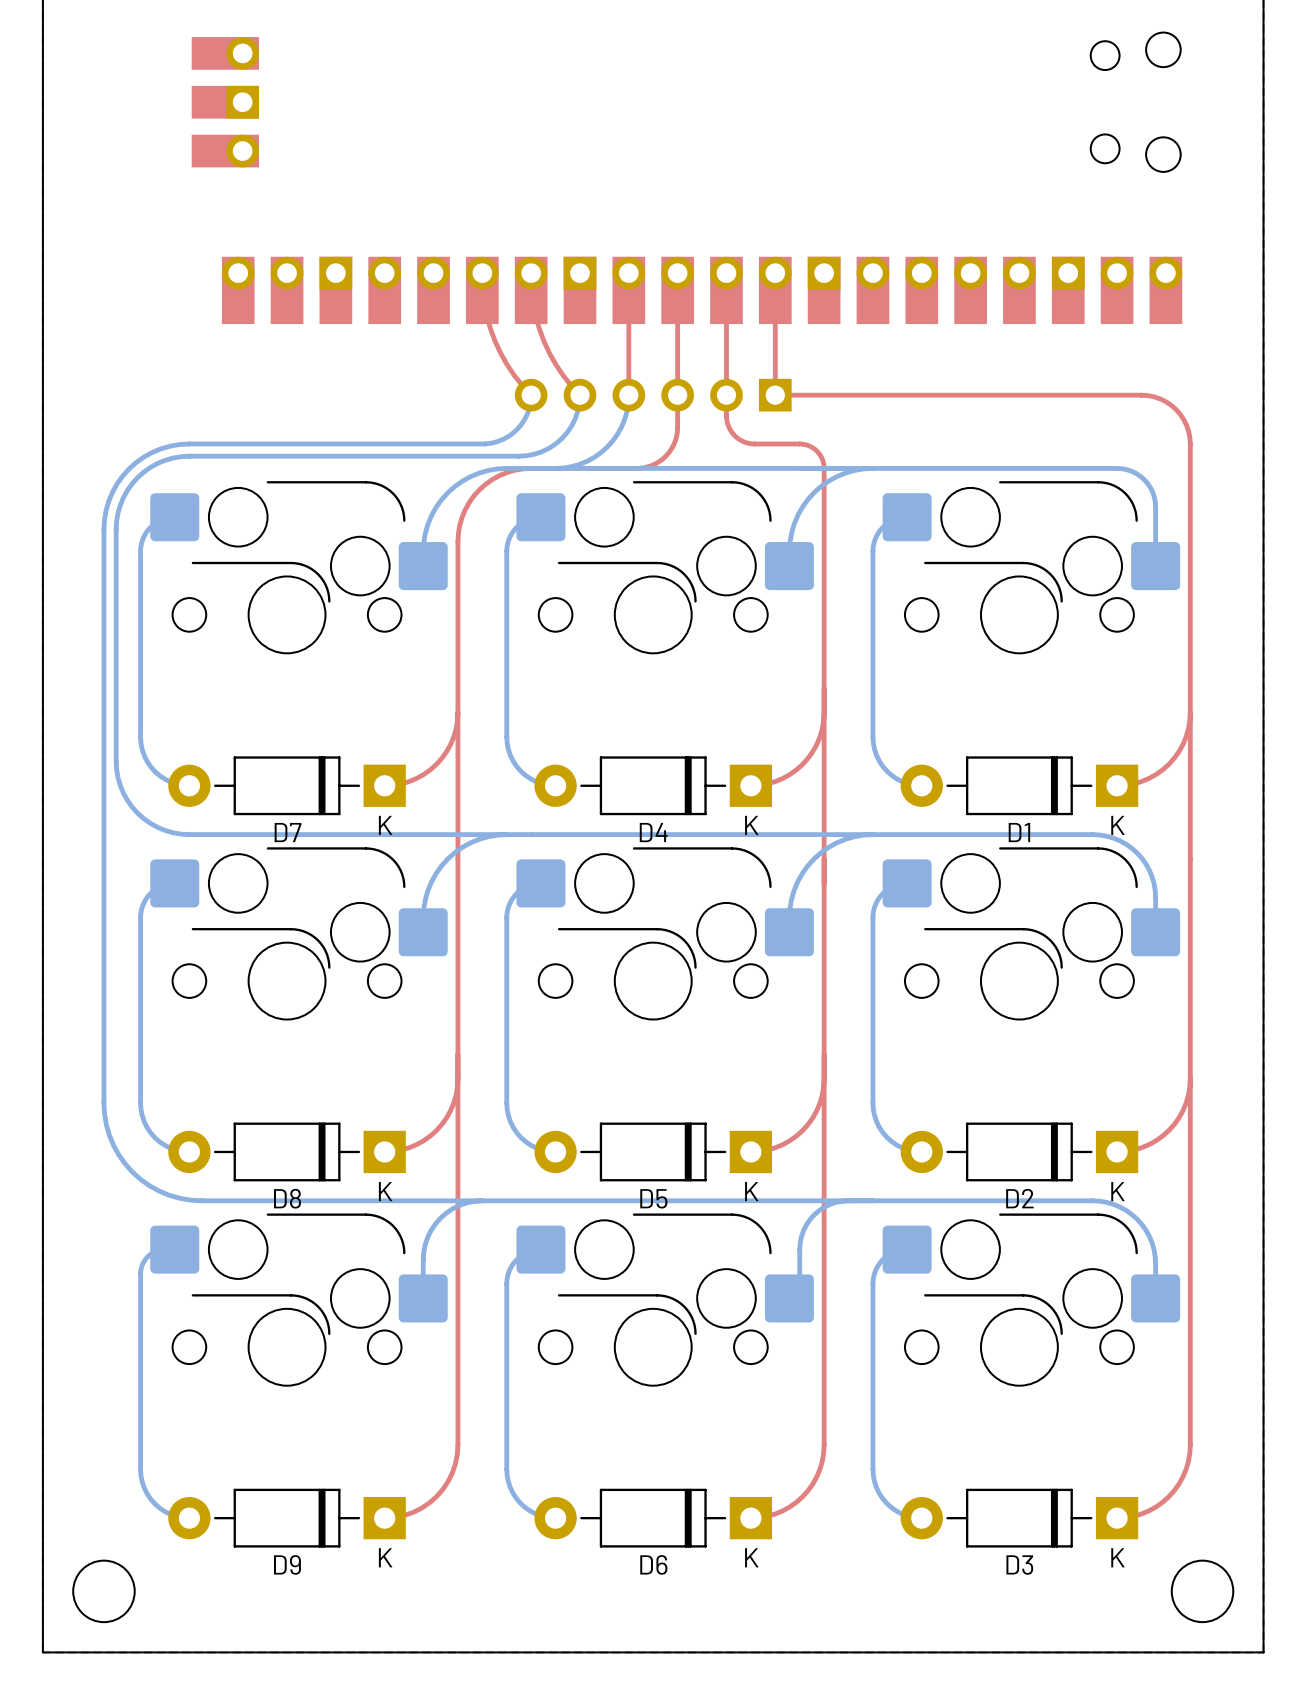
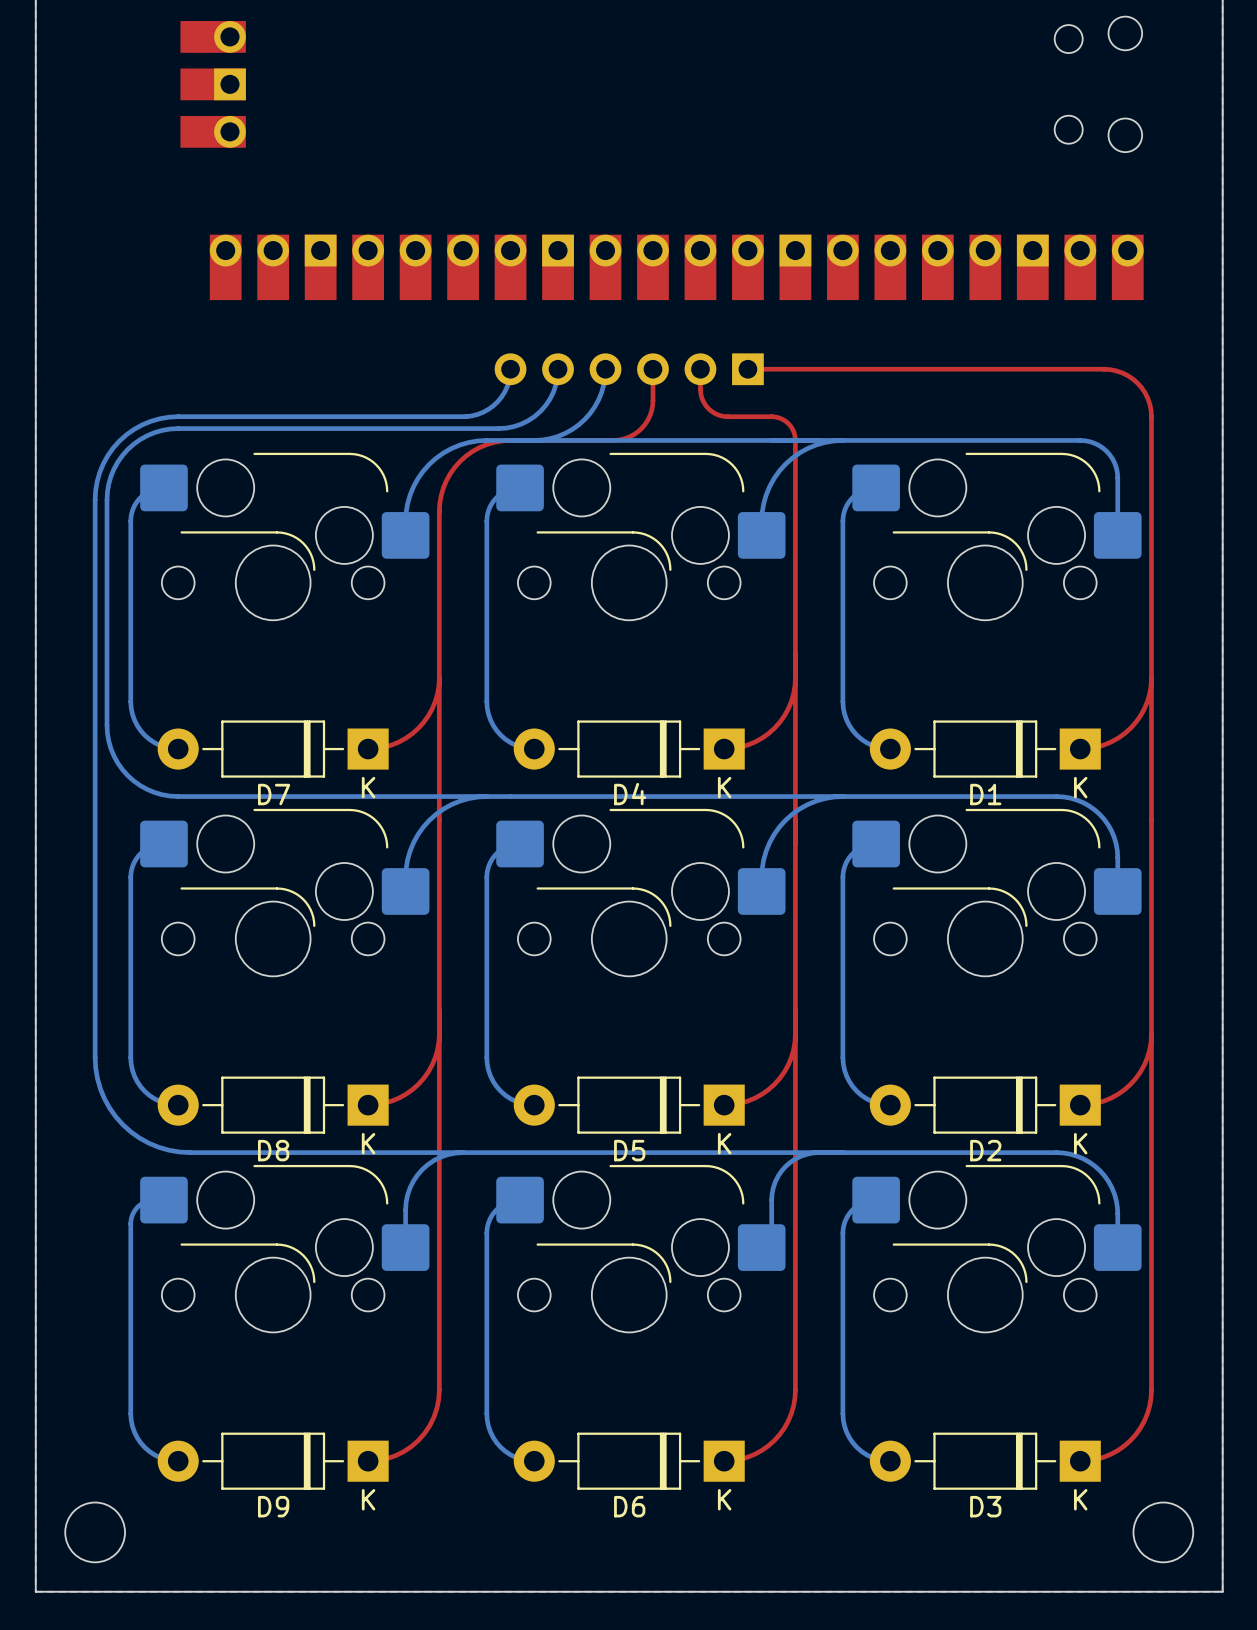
top track: (482, 273) (484, 303) (495, 341) (506, 364) (531, 395) -> none
top track: (531, 273) (533, 303) (543, 341) (555, 364) (580, 395) -> none
top track: (628, 273) (628, 395) -> none
top track: (677, 273) (677, 395) -> none
top track: (726, 273) (726, 395) -> none
top track: (775, 273) (775, 395) -> none

